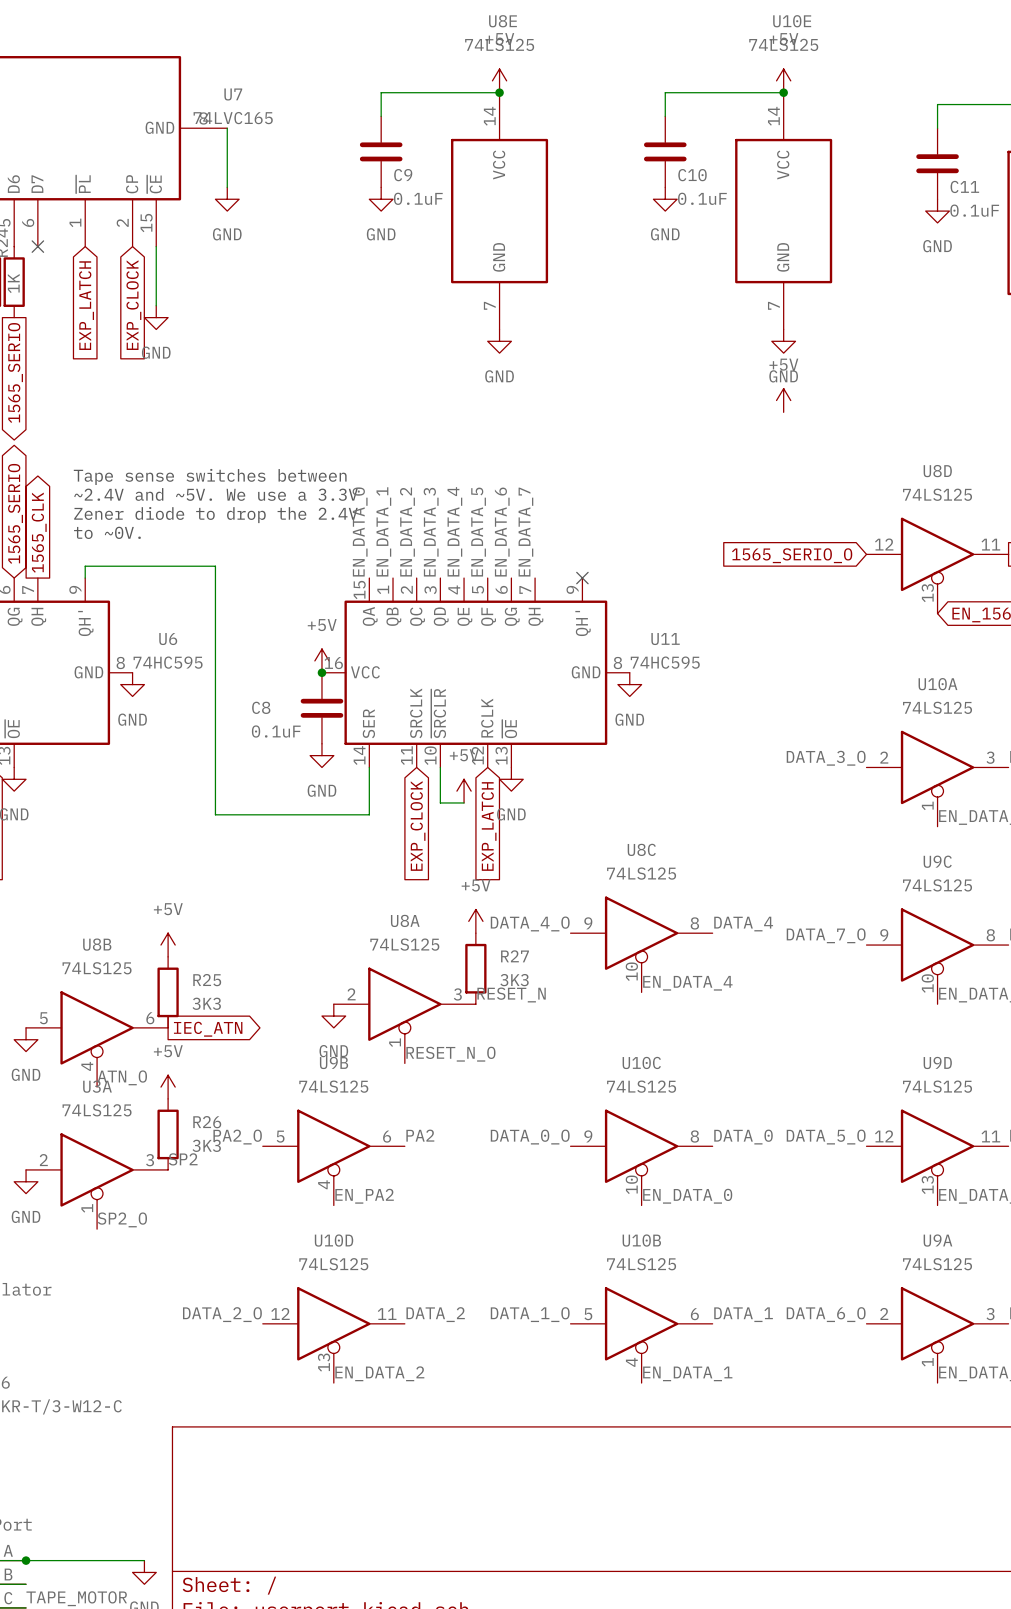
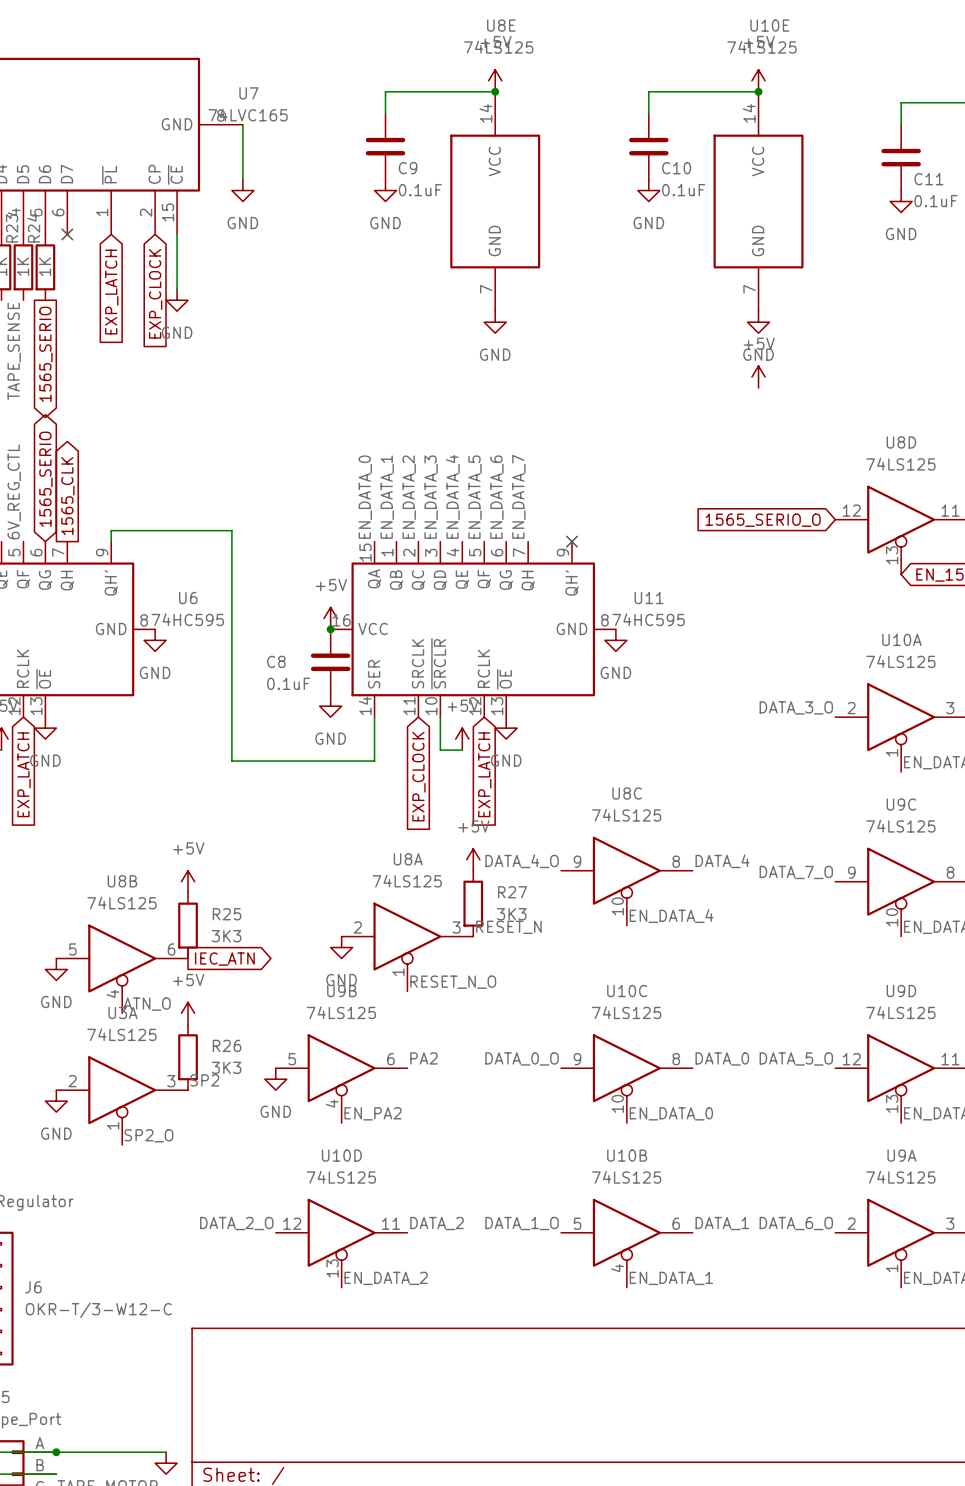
text: Tape sense switches between (210, 476) -> none
text: ~2.4V and ~5V. We use a 3.3V (215, 494) -> none
text: Zener diode to drop the 2.4V (215, 515) -> none
text: to ~0V. (107, 532) -> none
label: PA2_O (237, 1137) -> none
power symbol: none -> GND (275, 1079)

